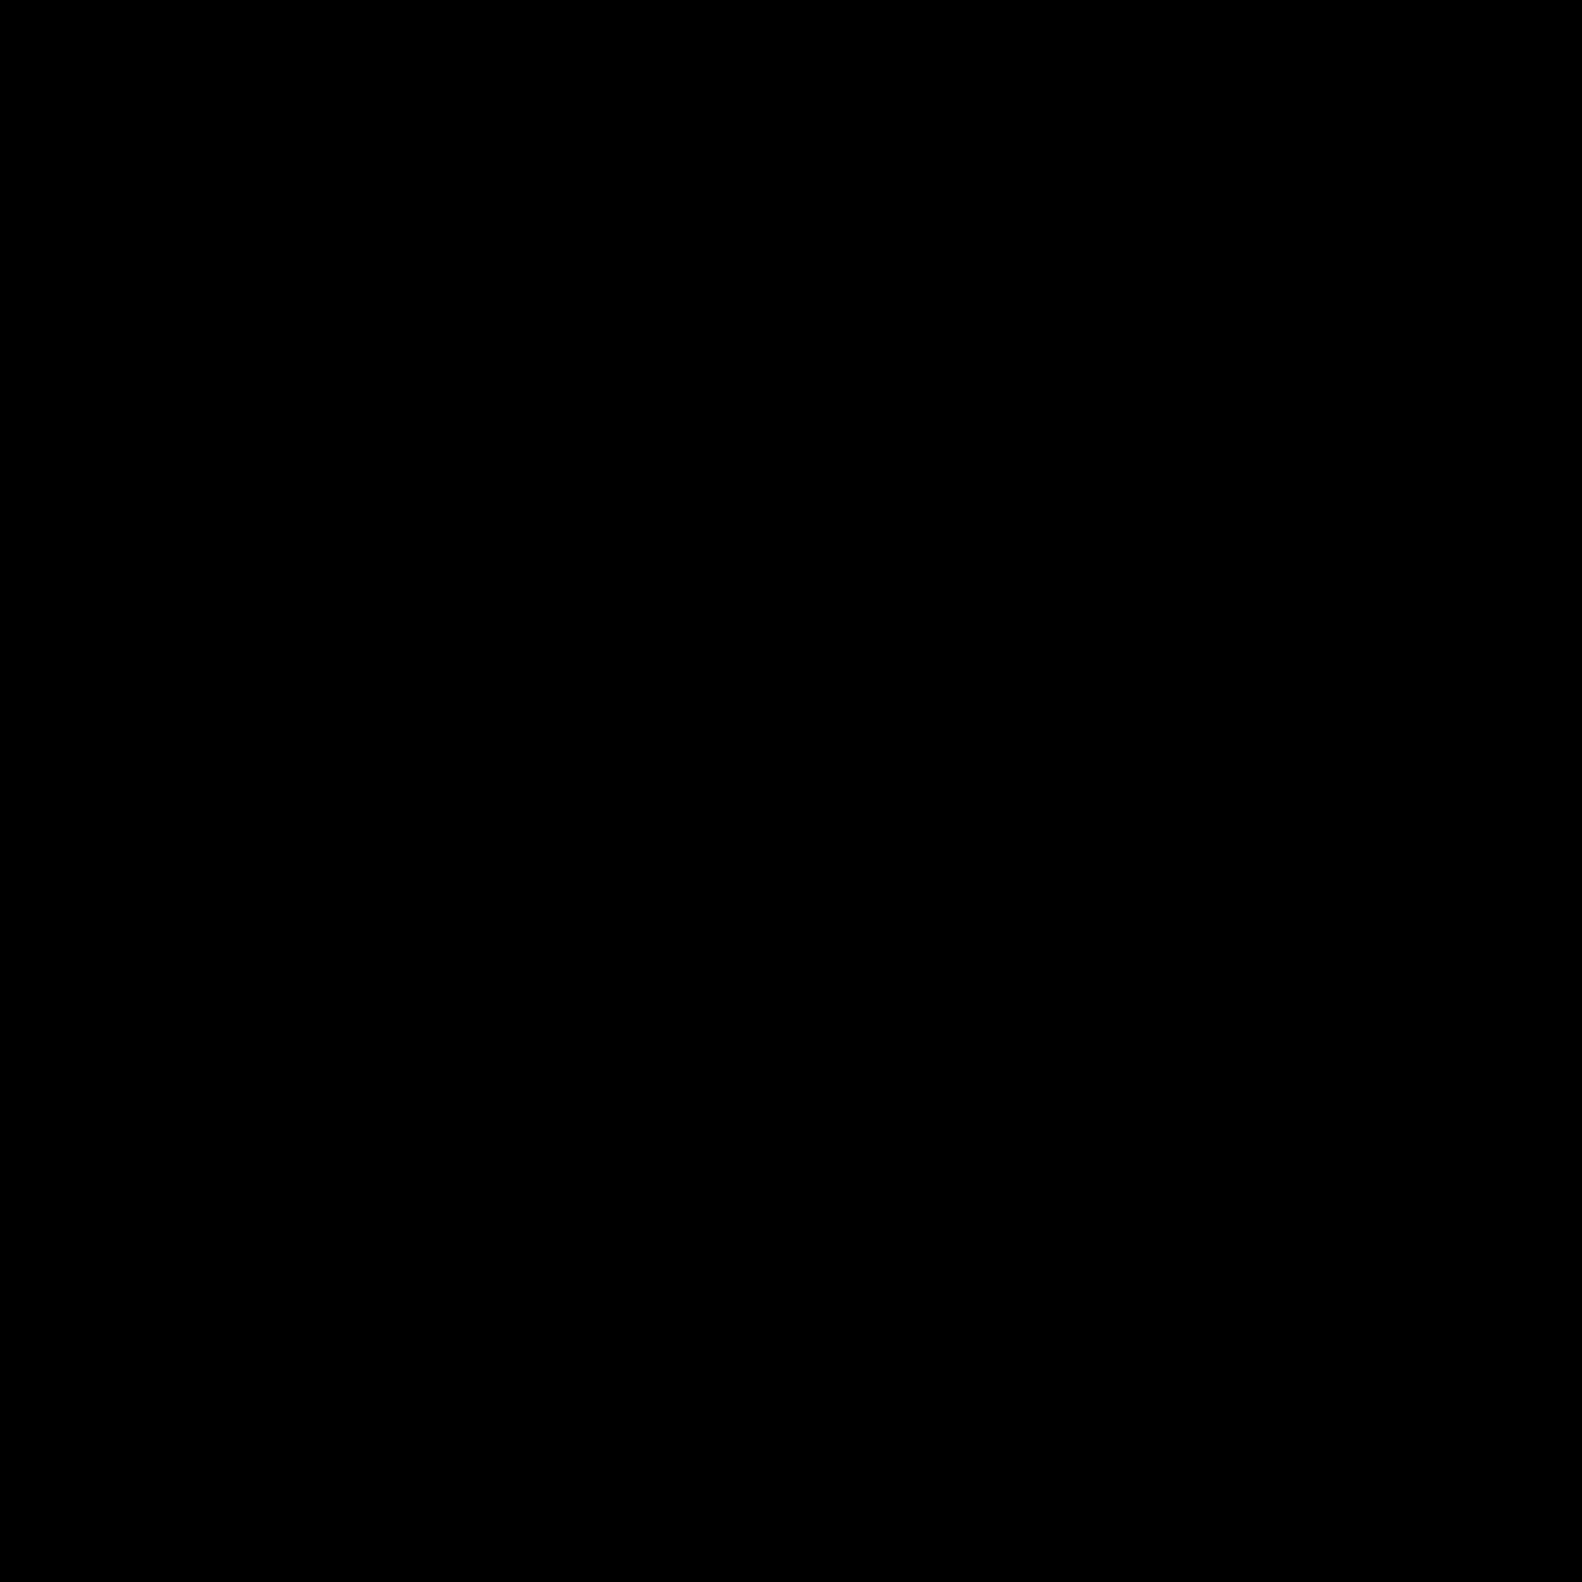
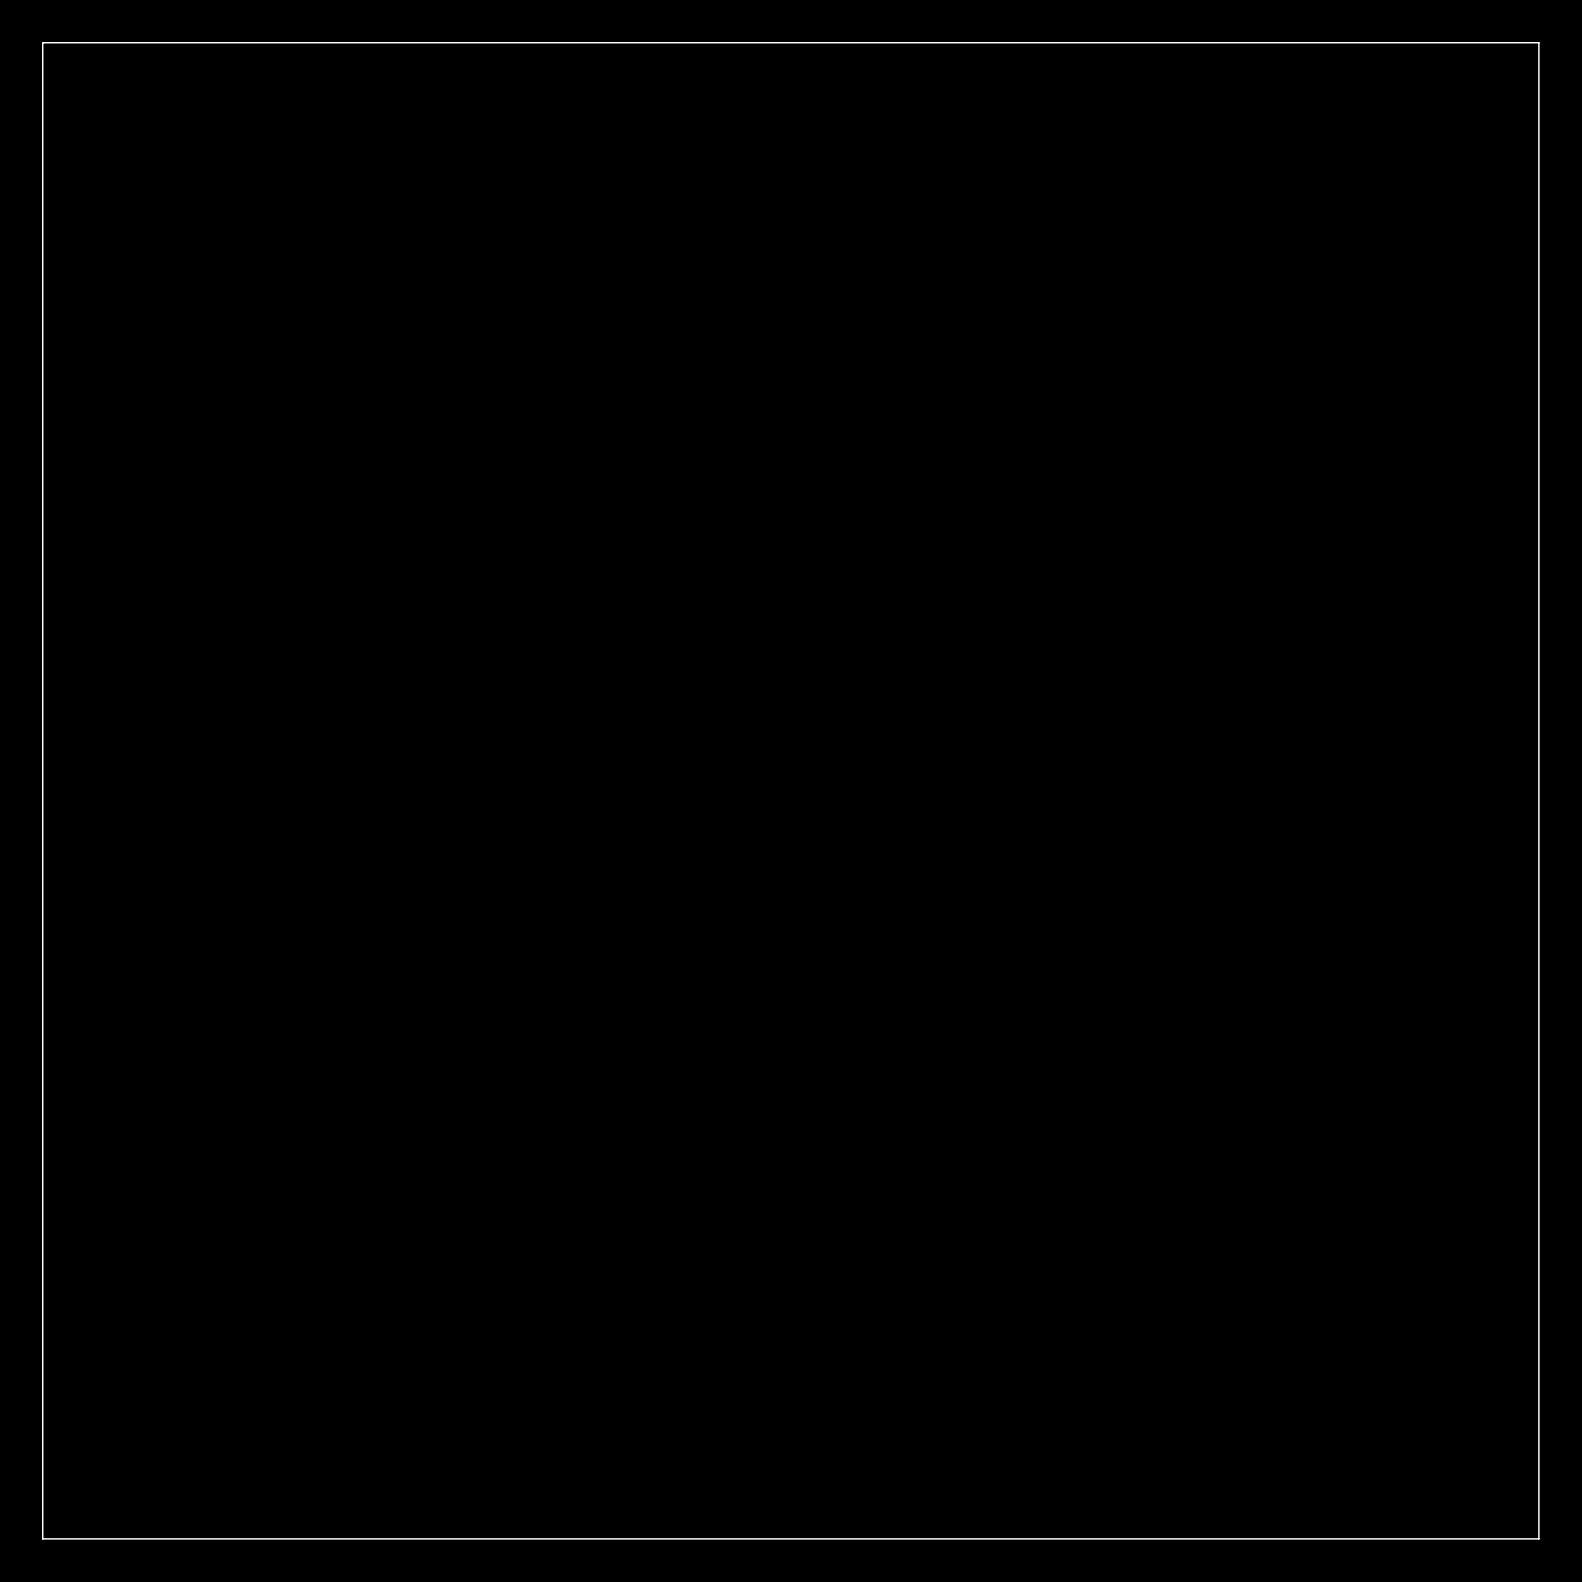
board edge: none -> (1538, 42) (42, 42) (42, 1538) (1538, 1538) (1538, 42)

